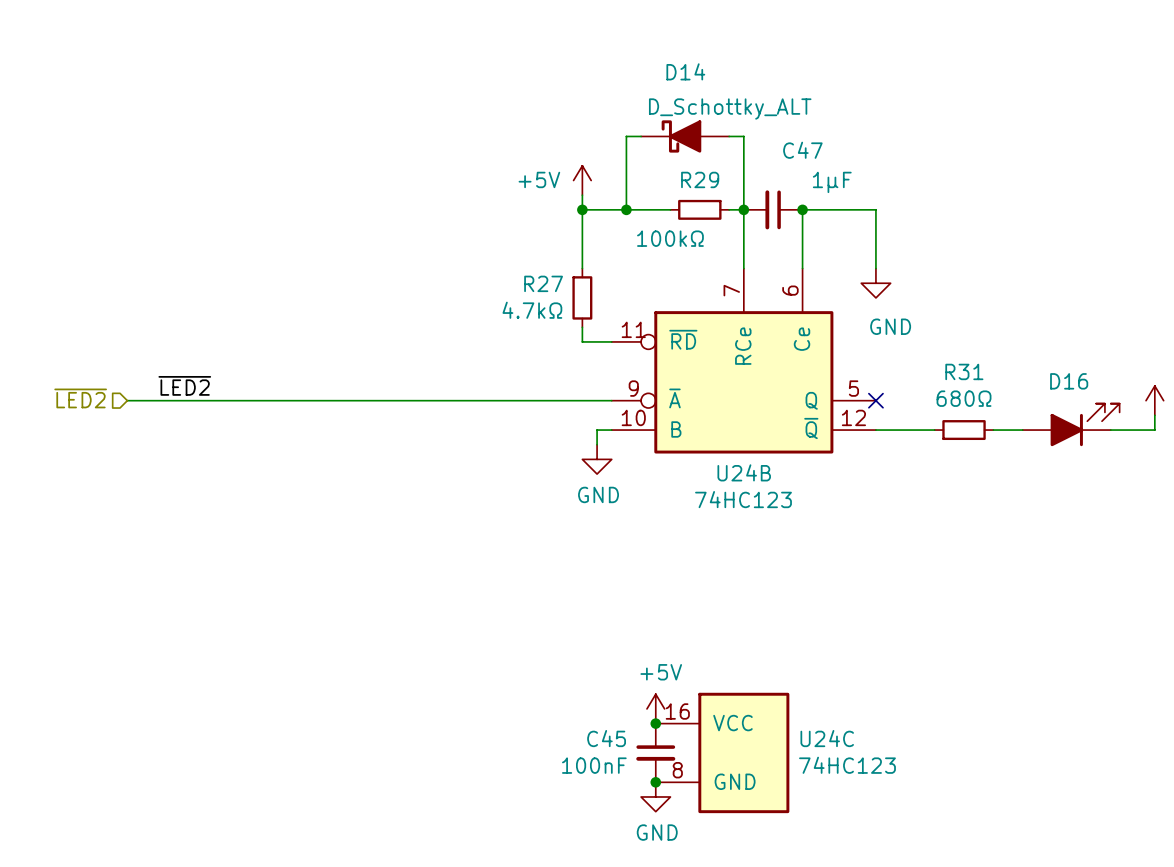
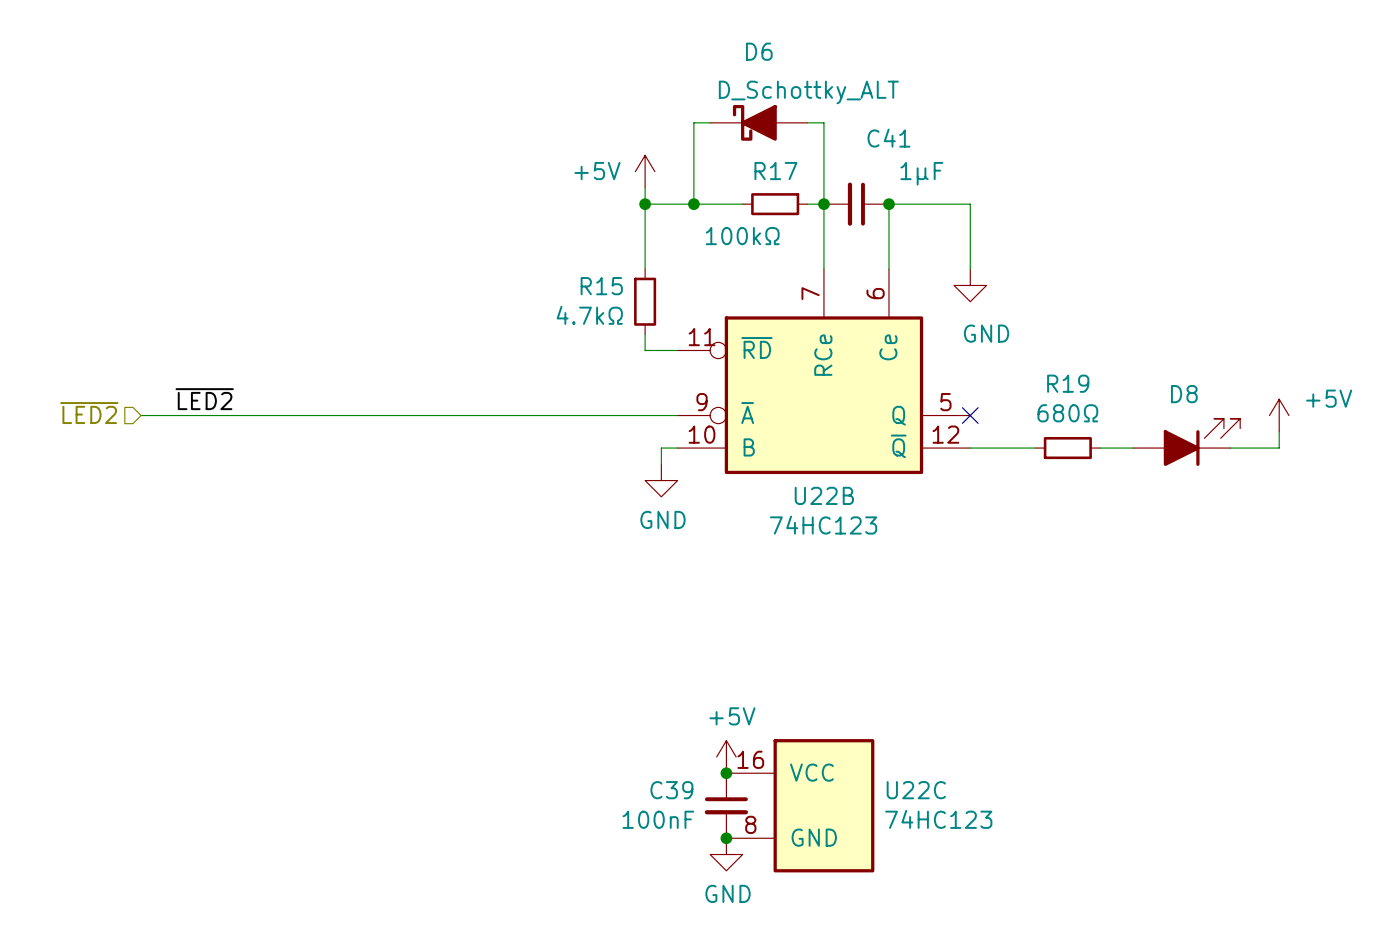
D14 name: D14 (685, 71) -> D6 (759, 51)
C47 name: C47 (802, 150) -> C41 (888, 138)
R29 name: R29 (700, 179) -> R17 (775, 171)
R27 name: R27 (543, 283) -> R15 (601, 286)
R31 name: R31 (964, 371) -> R19 (1068, 383)
D16 name: D16 (1069, 381) -> D8 (1184, 394)
U24B name: U24B (744, 472) -> U22B (824, 495)
C45 name: C45 (606, 738) -> C39 (671, 790)
U24C name: U24C (827, 738) -> U22C (916, 790)

